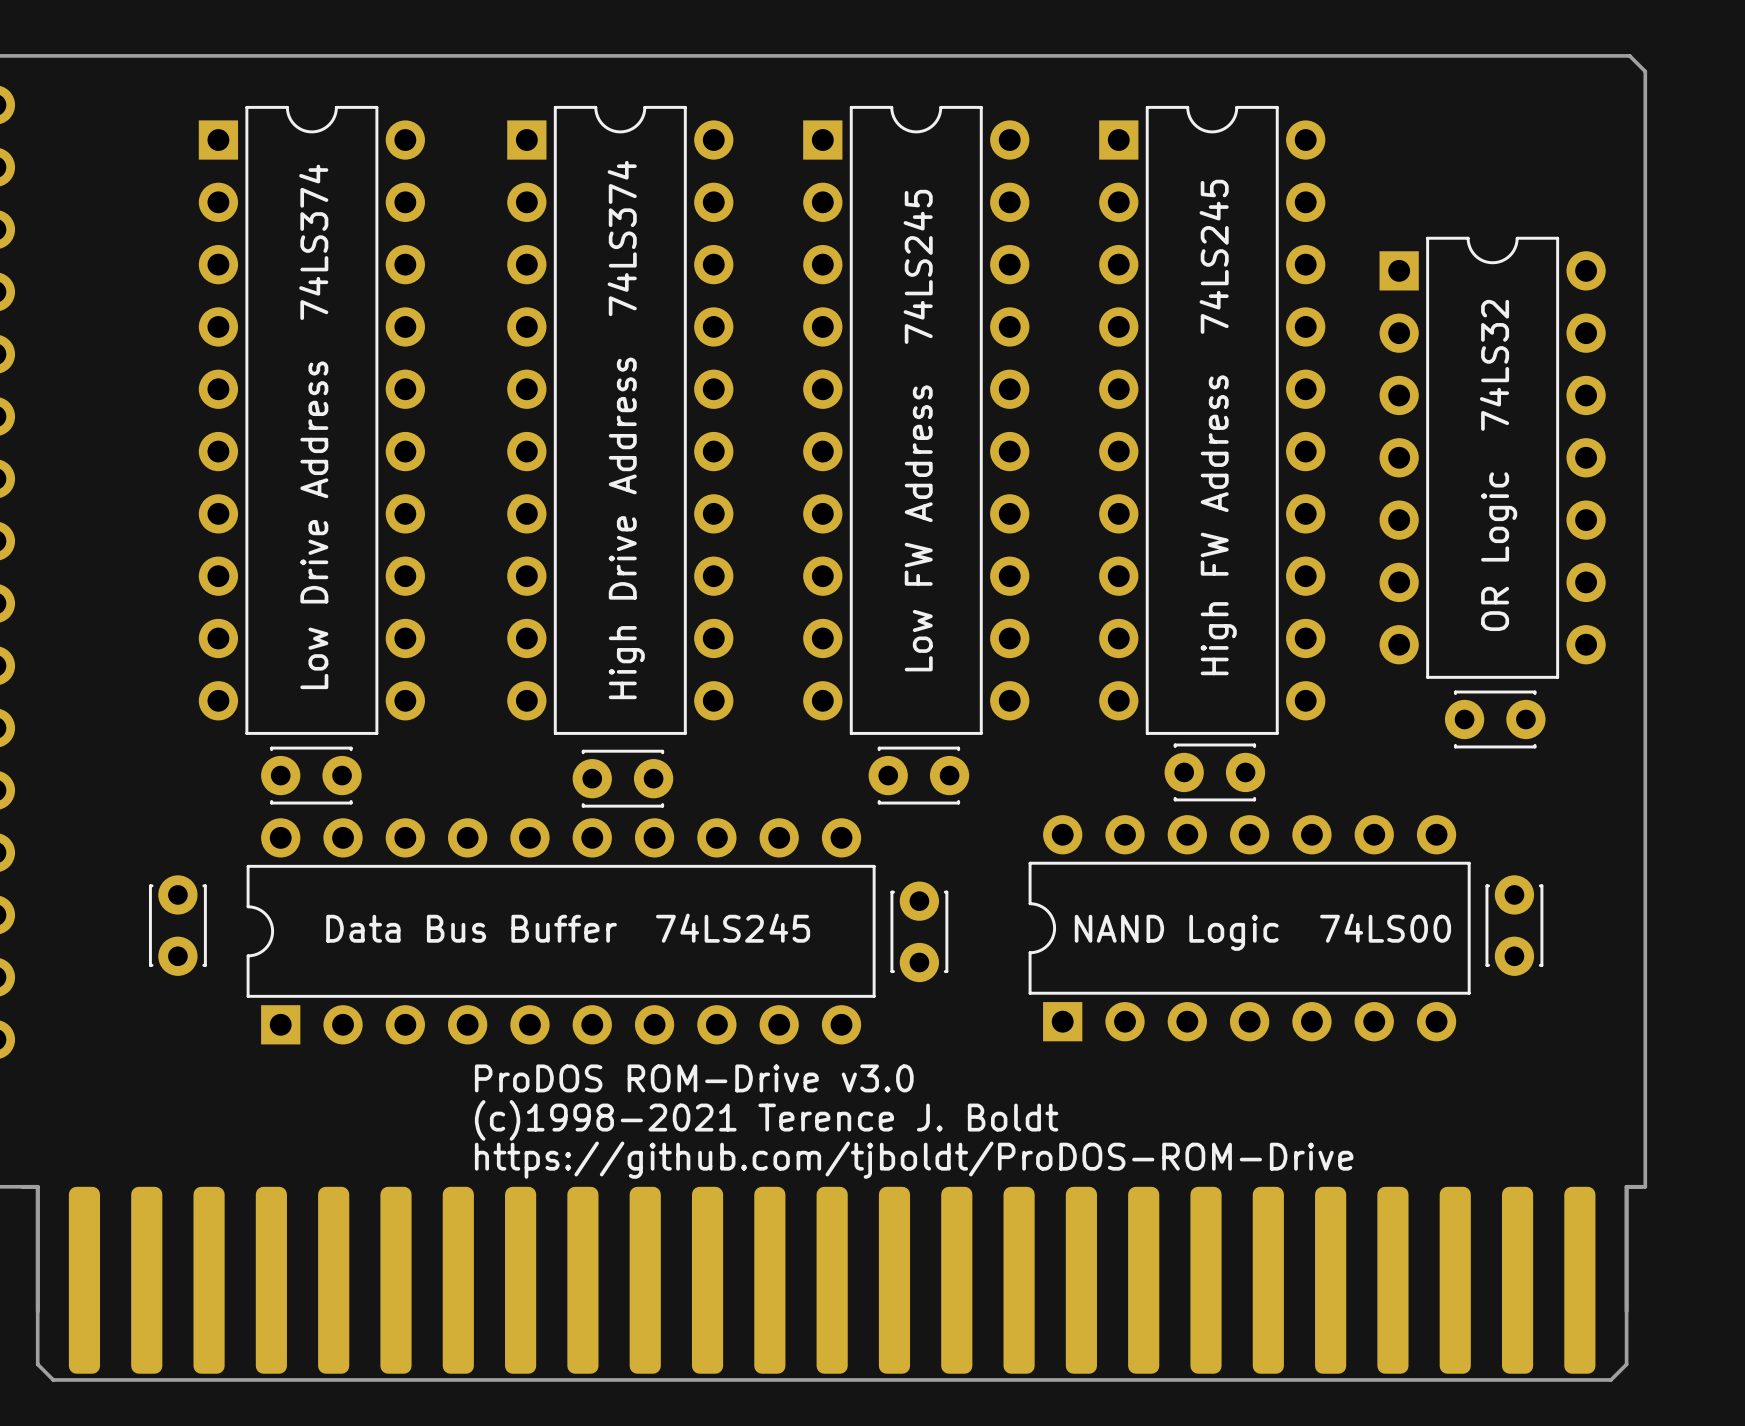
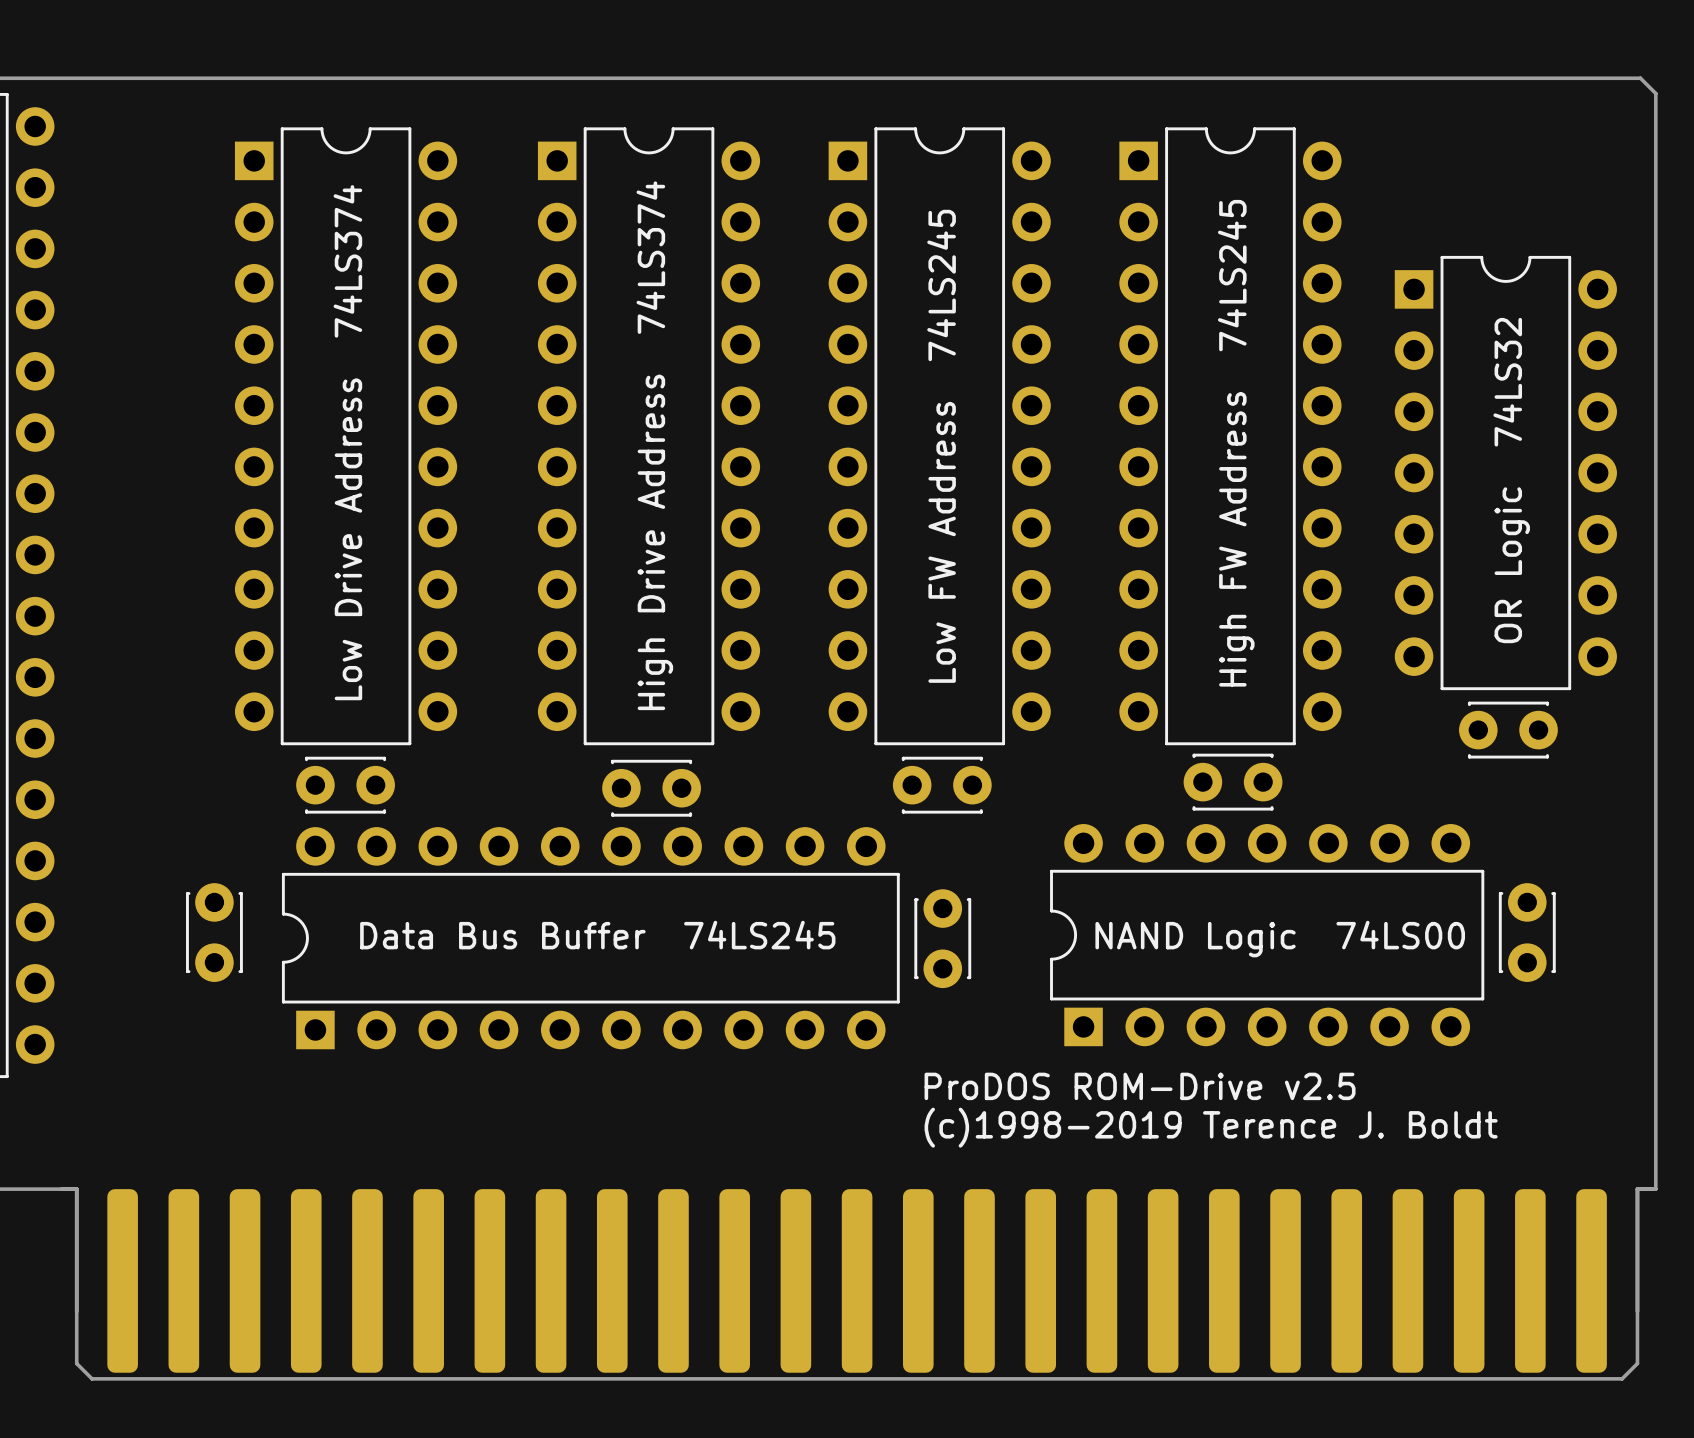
text: ProDOS ROM-Drive v3.0 (694, 1078) -> ProDOS ROM-Drive v2.5 (1140, 1086)
text: (c)1998-2021 Terence J. Boldt (766, 1120) -> (c)1998-2019 Terence J. Boldt (1211, 1127)
text: https://github.com/tjboldt/ProDOS-ROM-Drive (914, 1160) -> none

